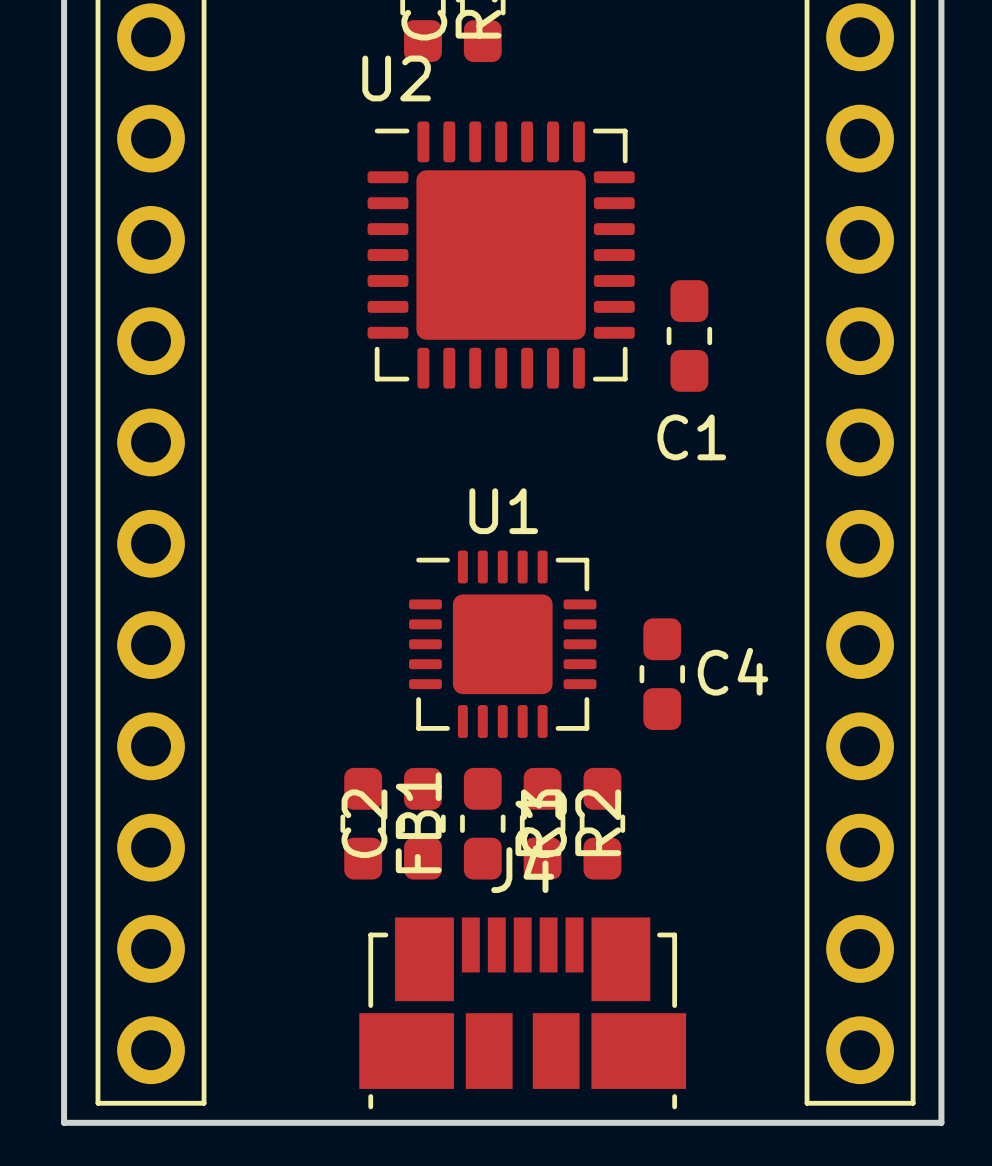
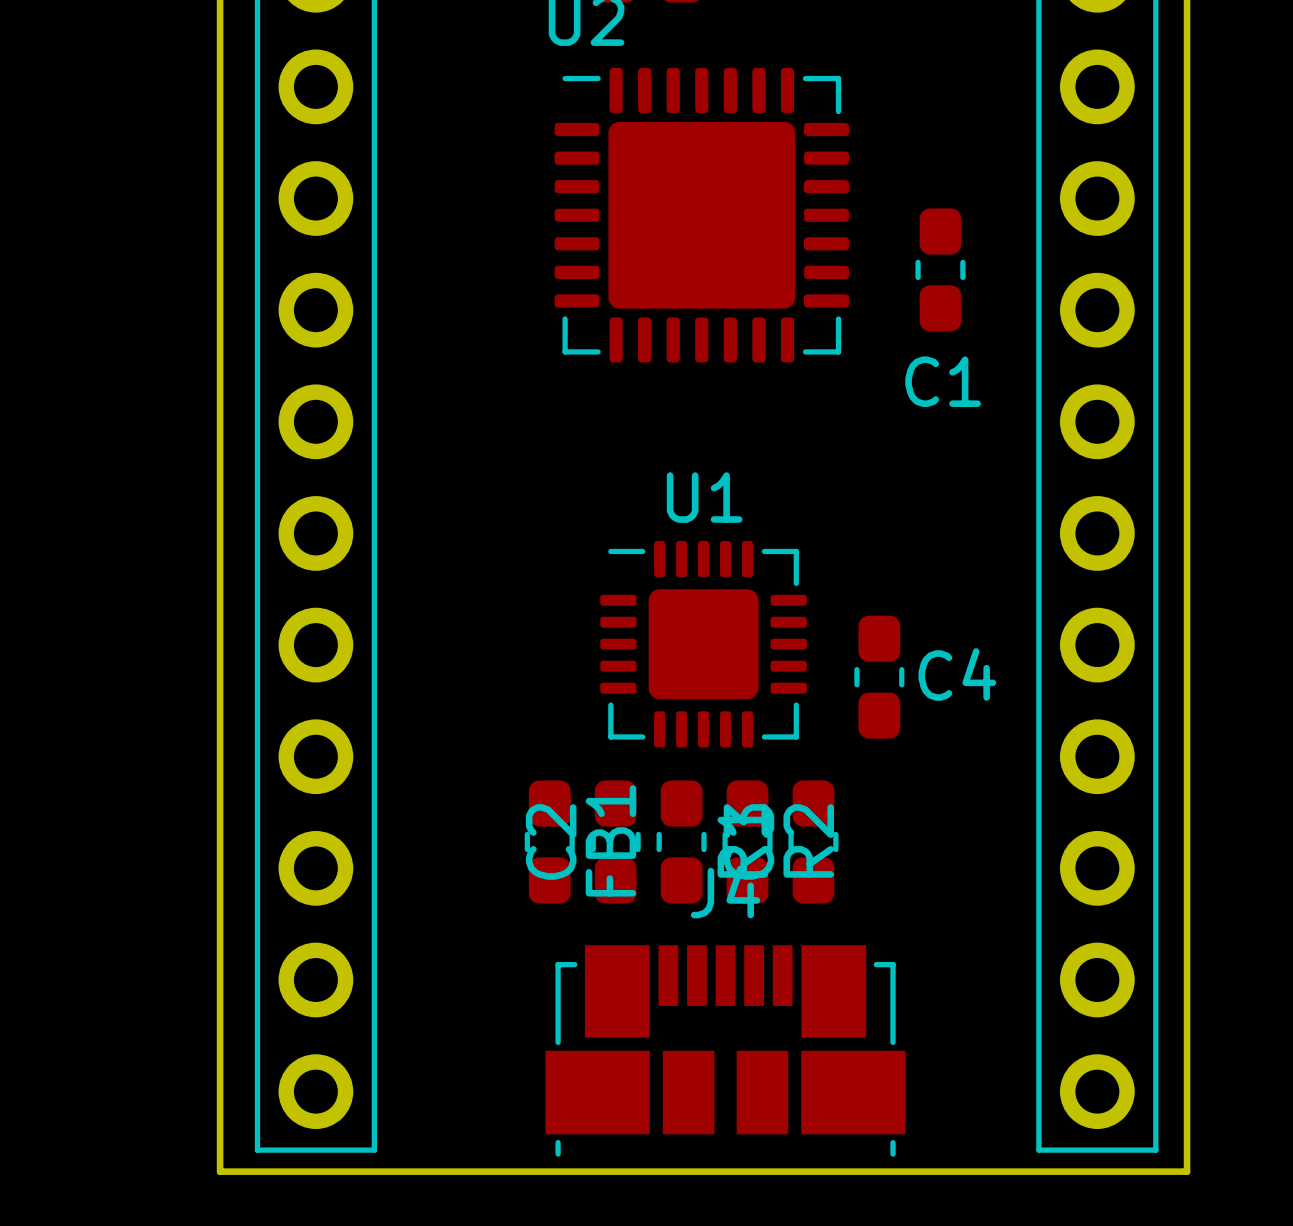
C1 position: (689, 335) -> (940, 269)

